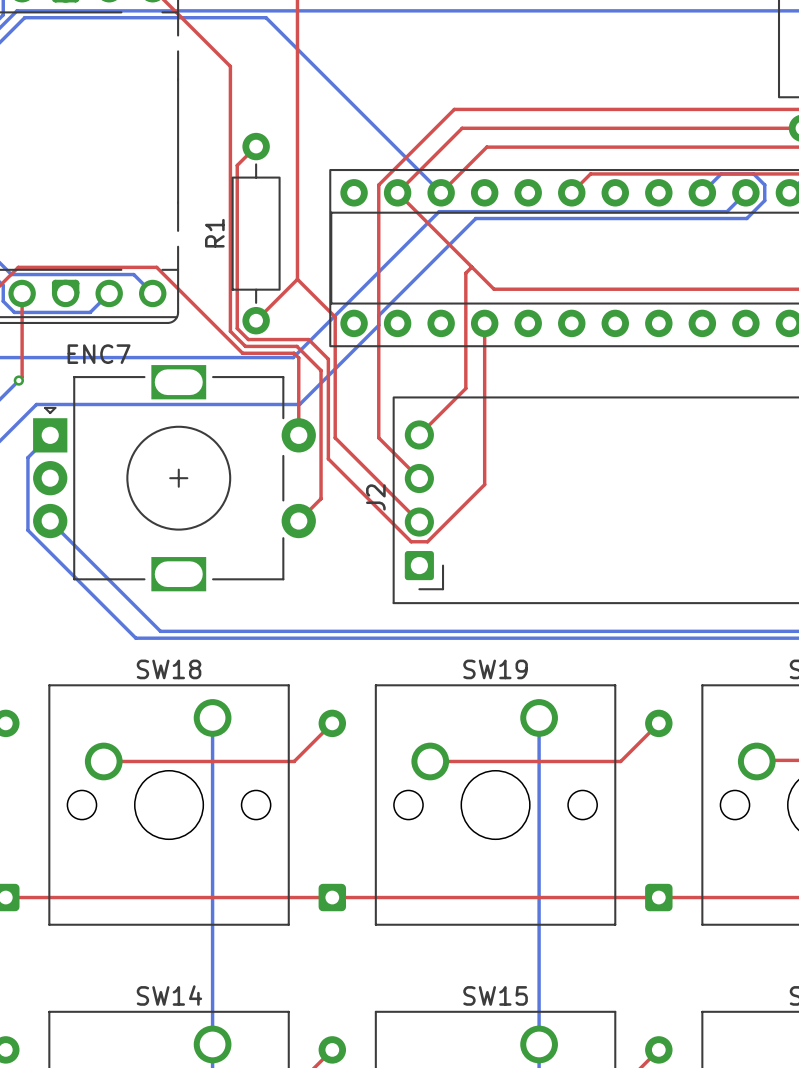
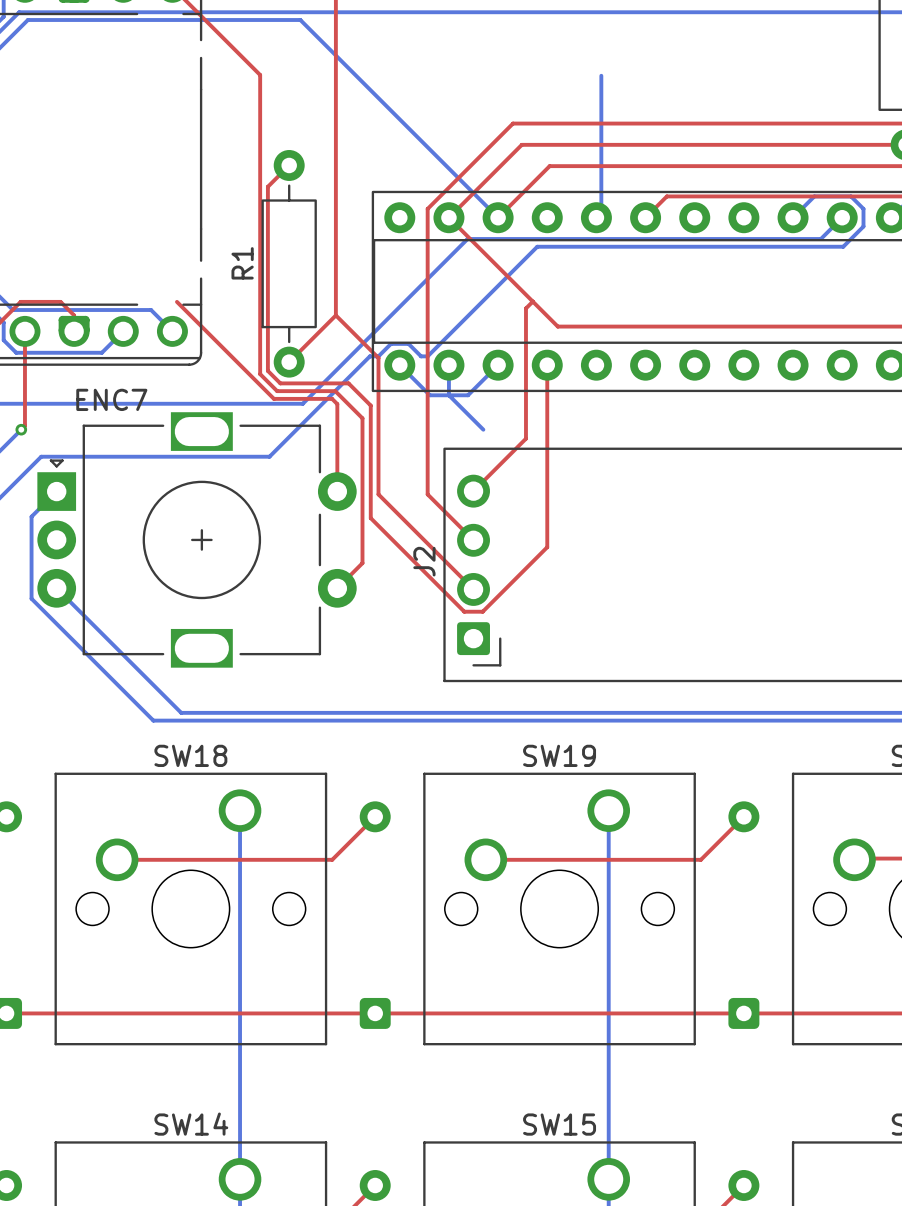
bottom track: none -> (601, 75) (601, 212) (596, 217)
bottom track: (439, 211) (346, 304) -> (495, 239) (467, 239) (302, 403)
top track: (53, 267) (156, 267) -> (60, 301) (74, 315) (74, 331)
bottom track: none -> (390, 343) (408, 343) (421, 356) (427, 356)
bottom track: (335, 315) (293, 357) (268, 357) -> none
bottom track: (378, 315) (378, 325) (299, 404) (238, 404) -> (378, 356) (369, 356) (269, 456)
bottom track: none -> (399, 365) (429, 395) (468, 395) (498, 365)
bottom track: none -> (448, 365) (448, 395) (483, 429)

